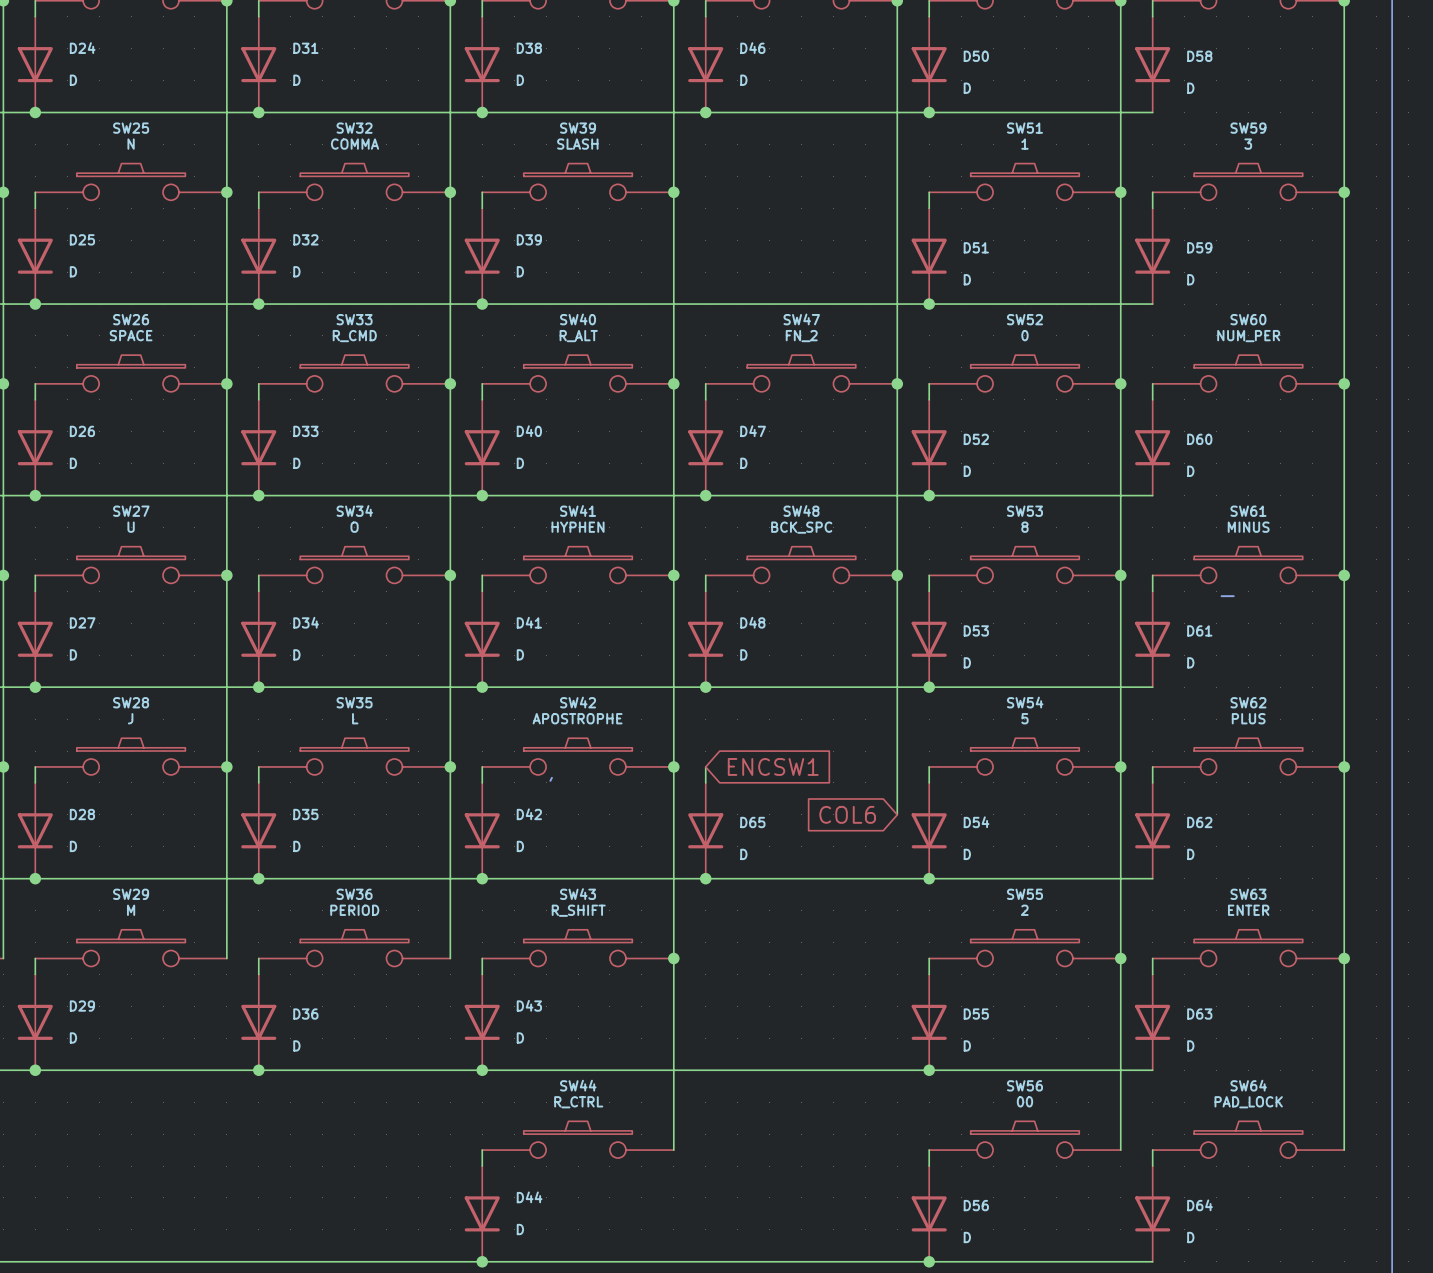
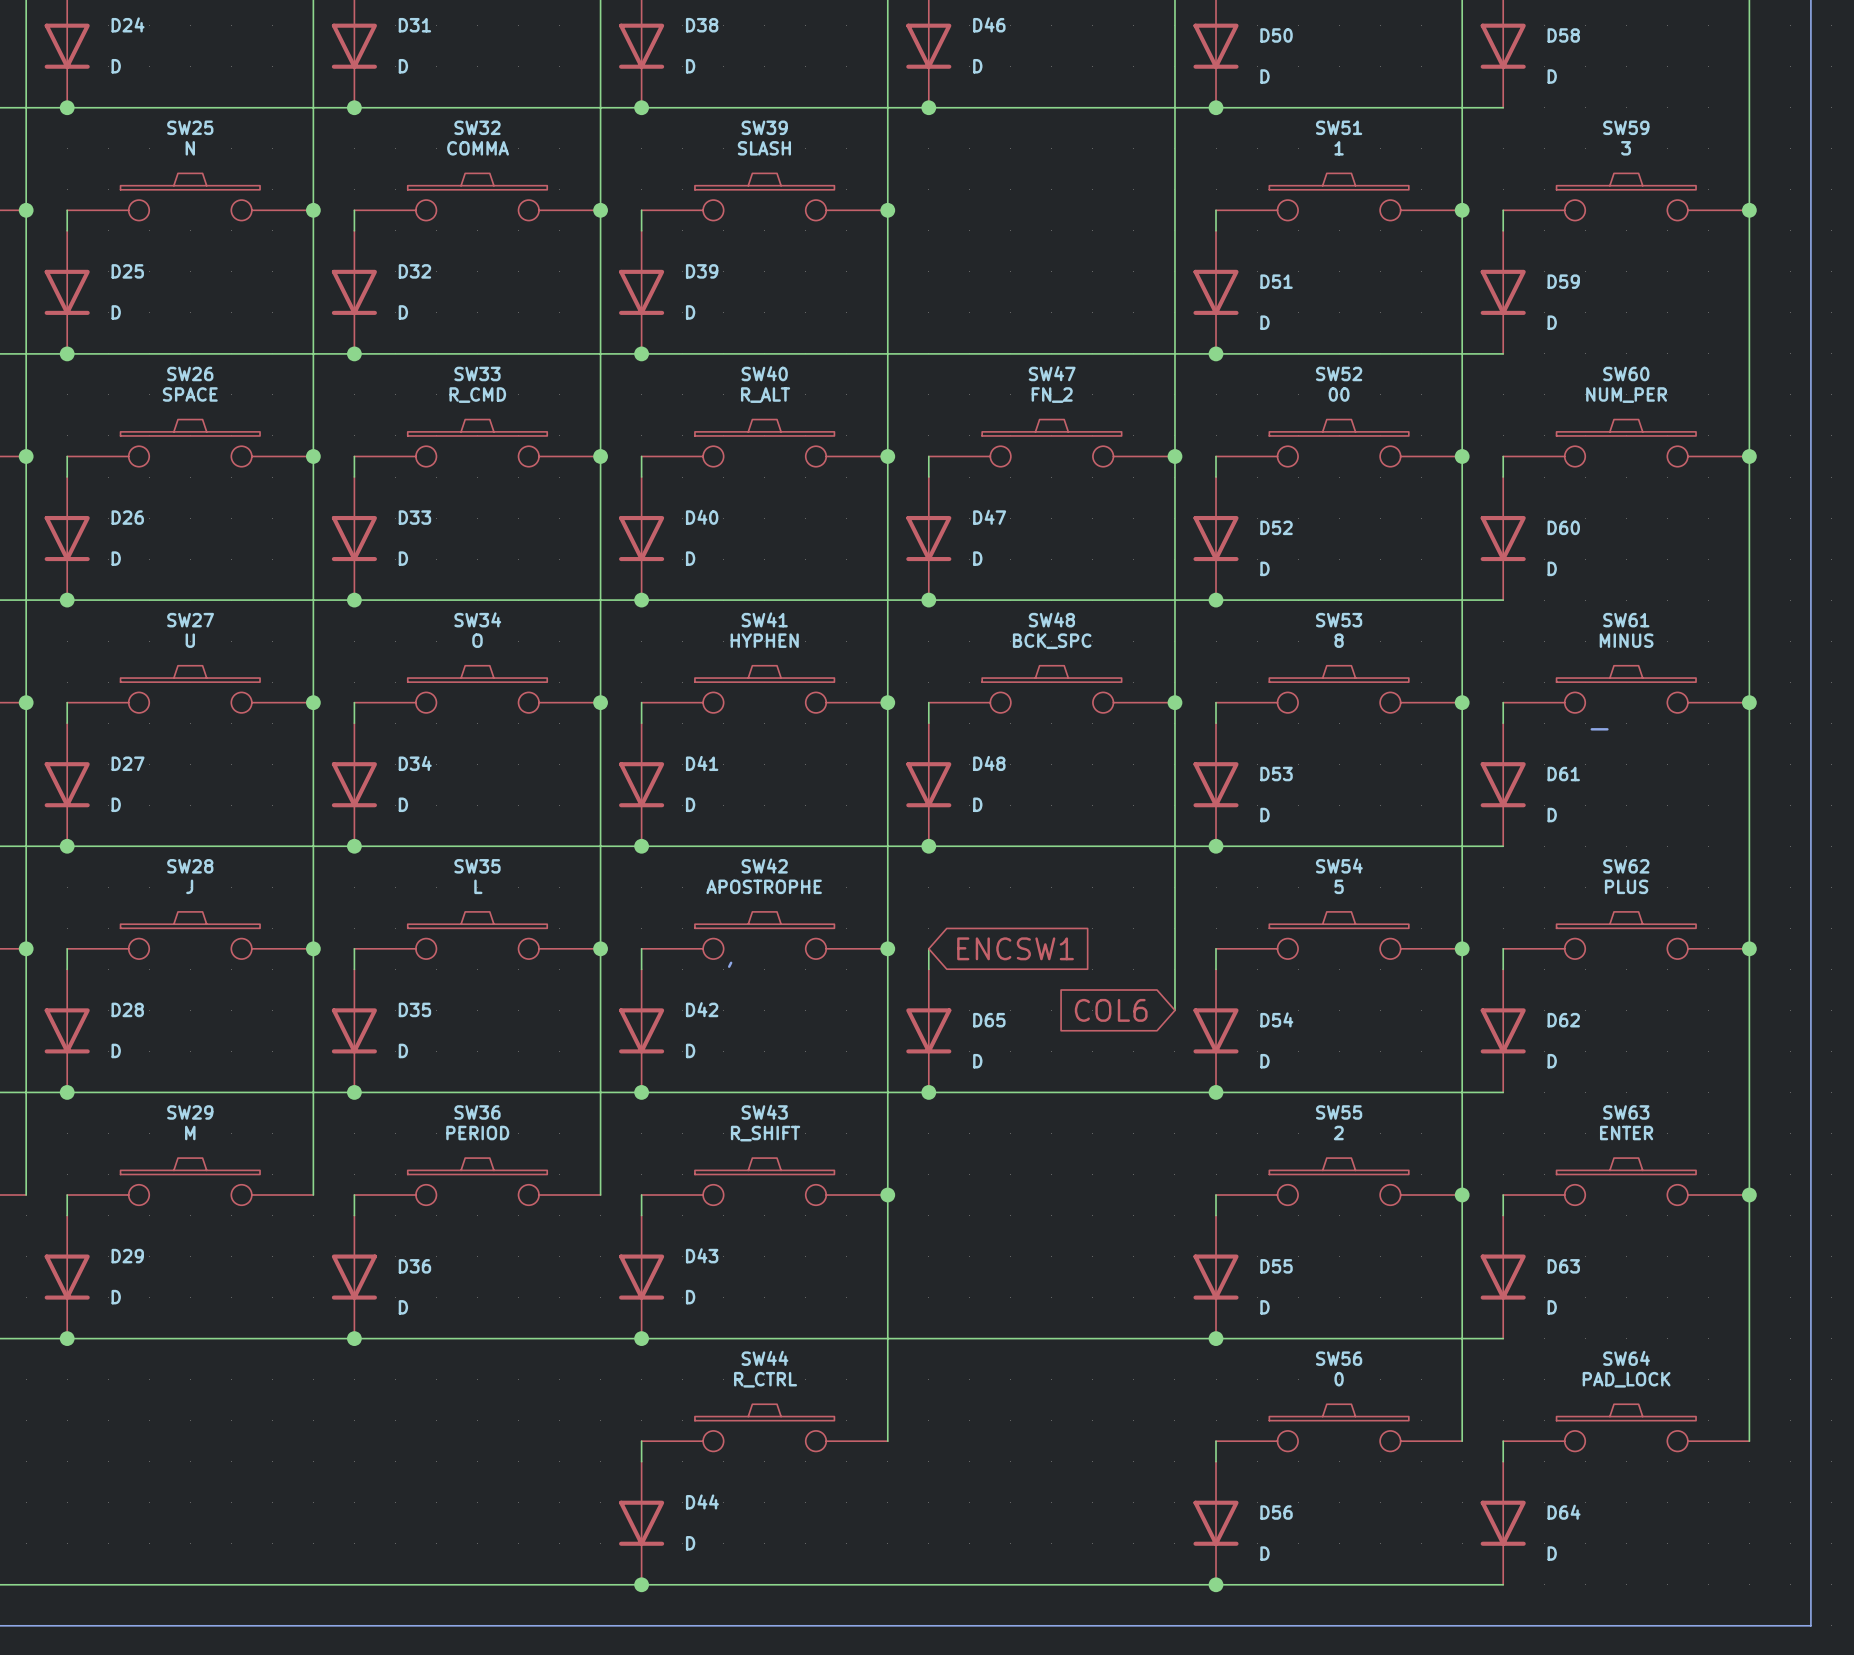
SW52 value: 0 (1024, 335) -> 00 (1339, 394)
SW56 value: 00 (1024, 1101) -> 0 (1339, 1379)

